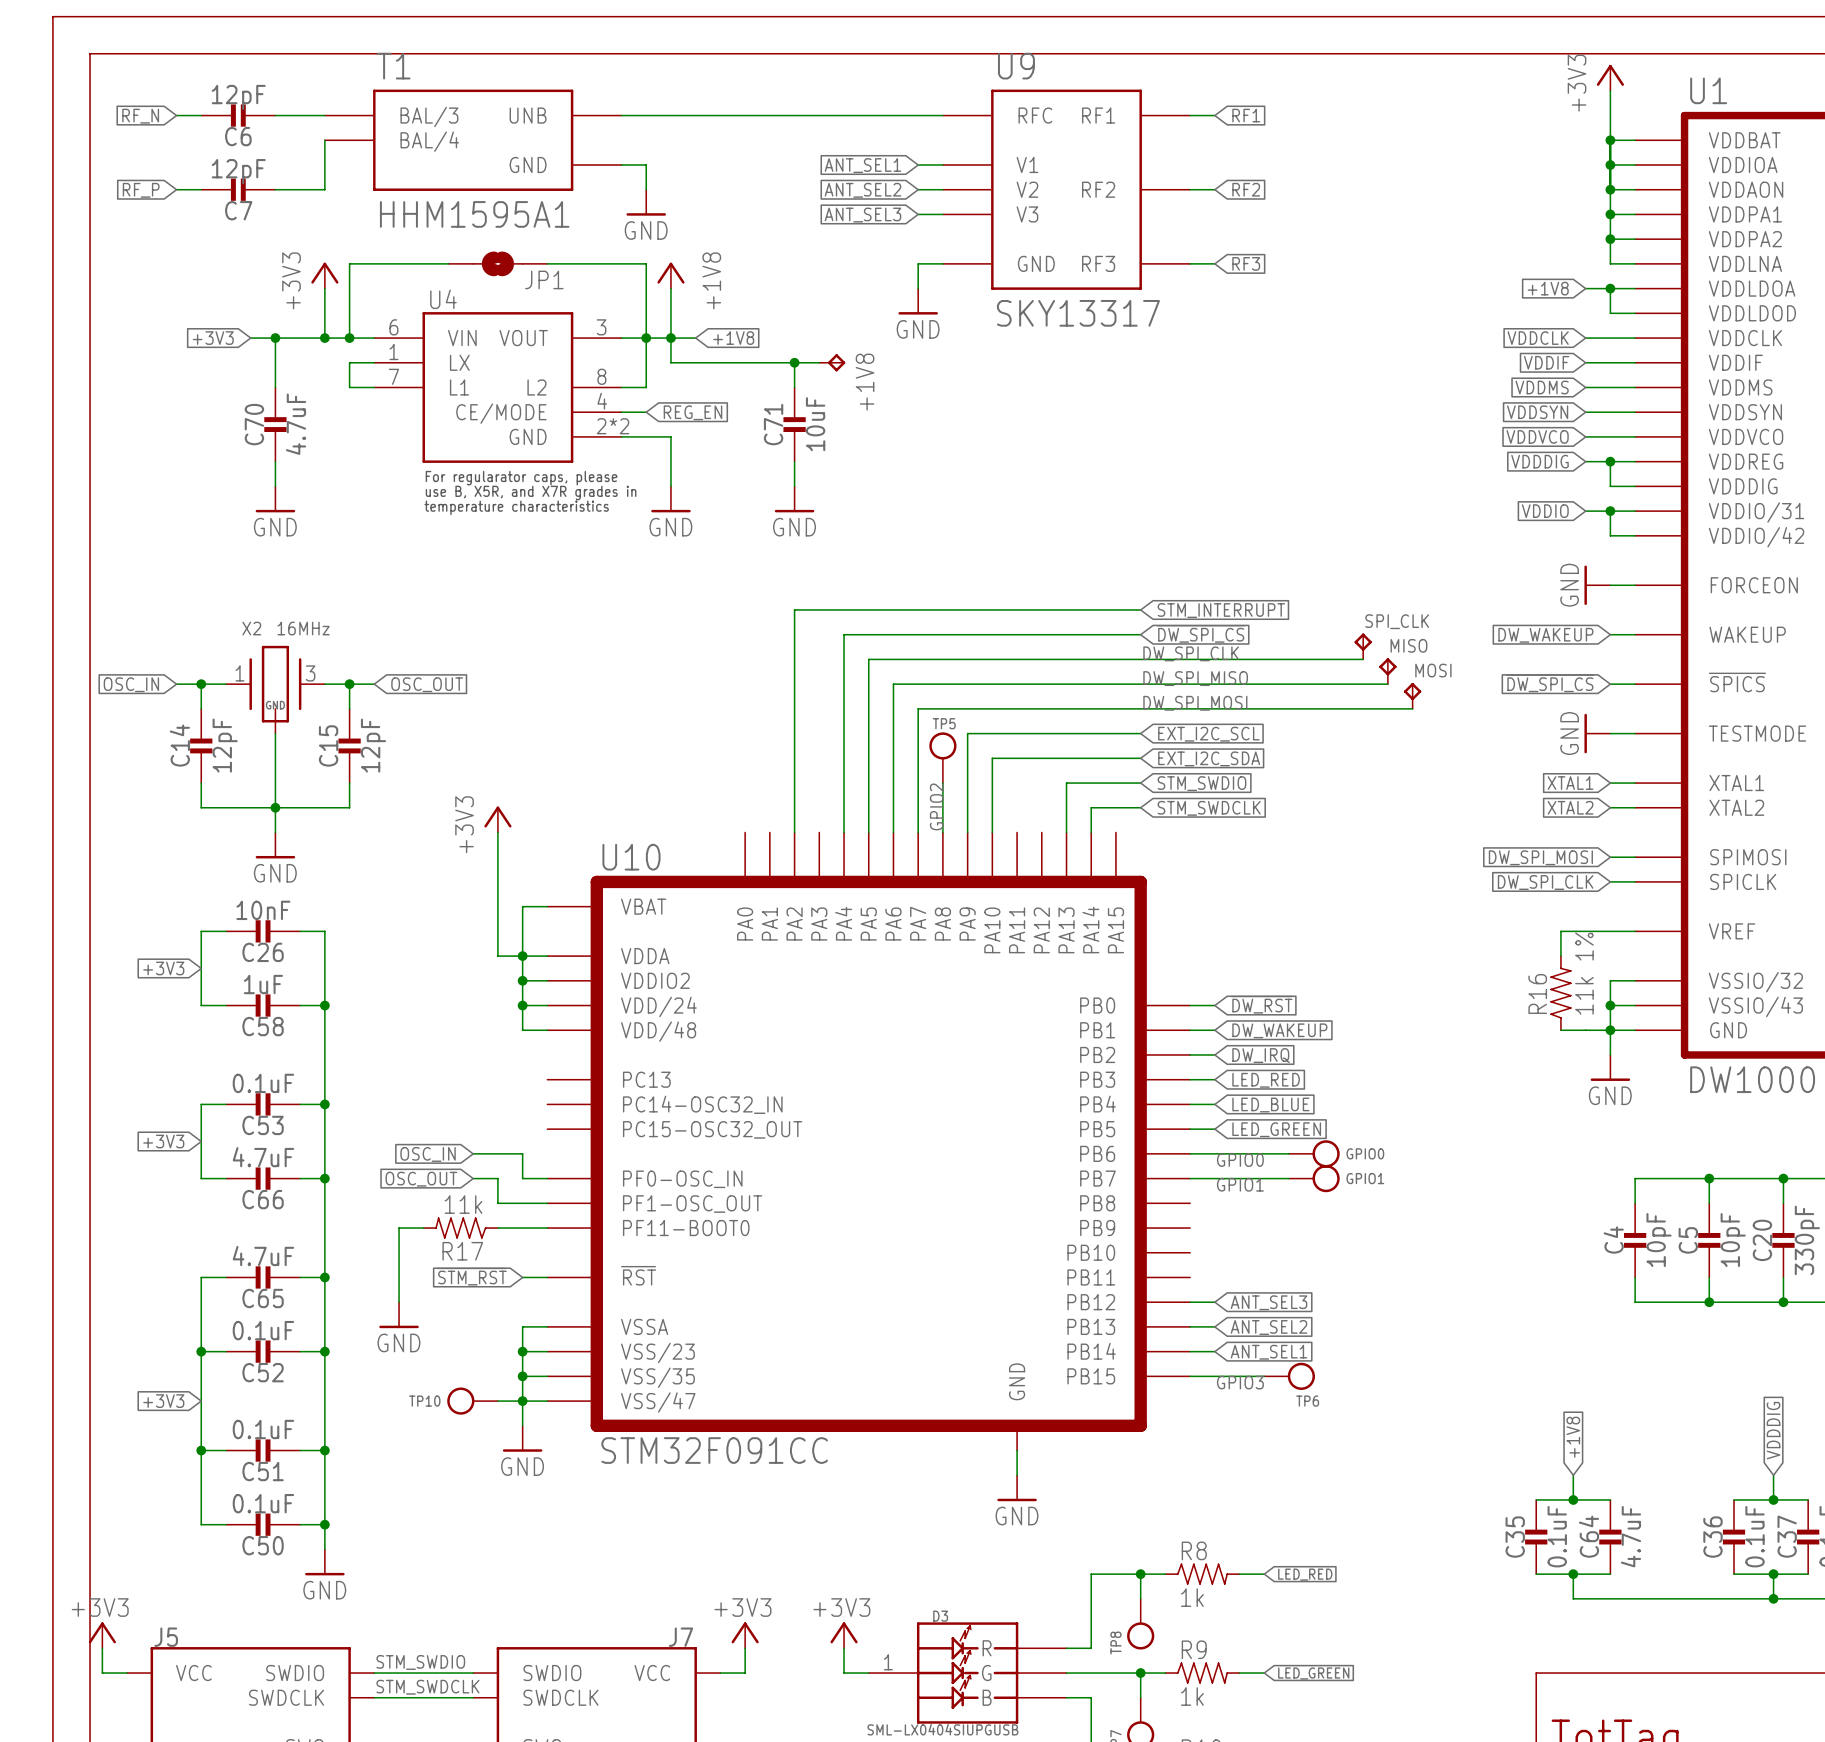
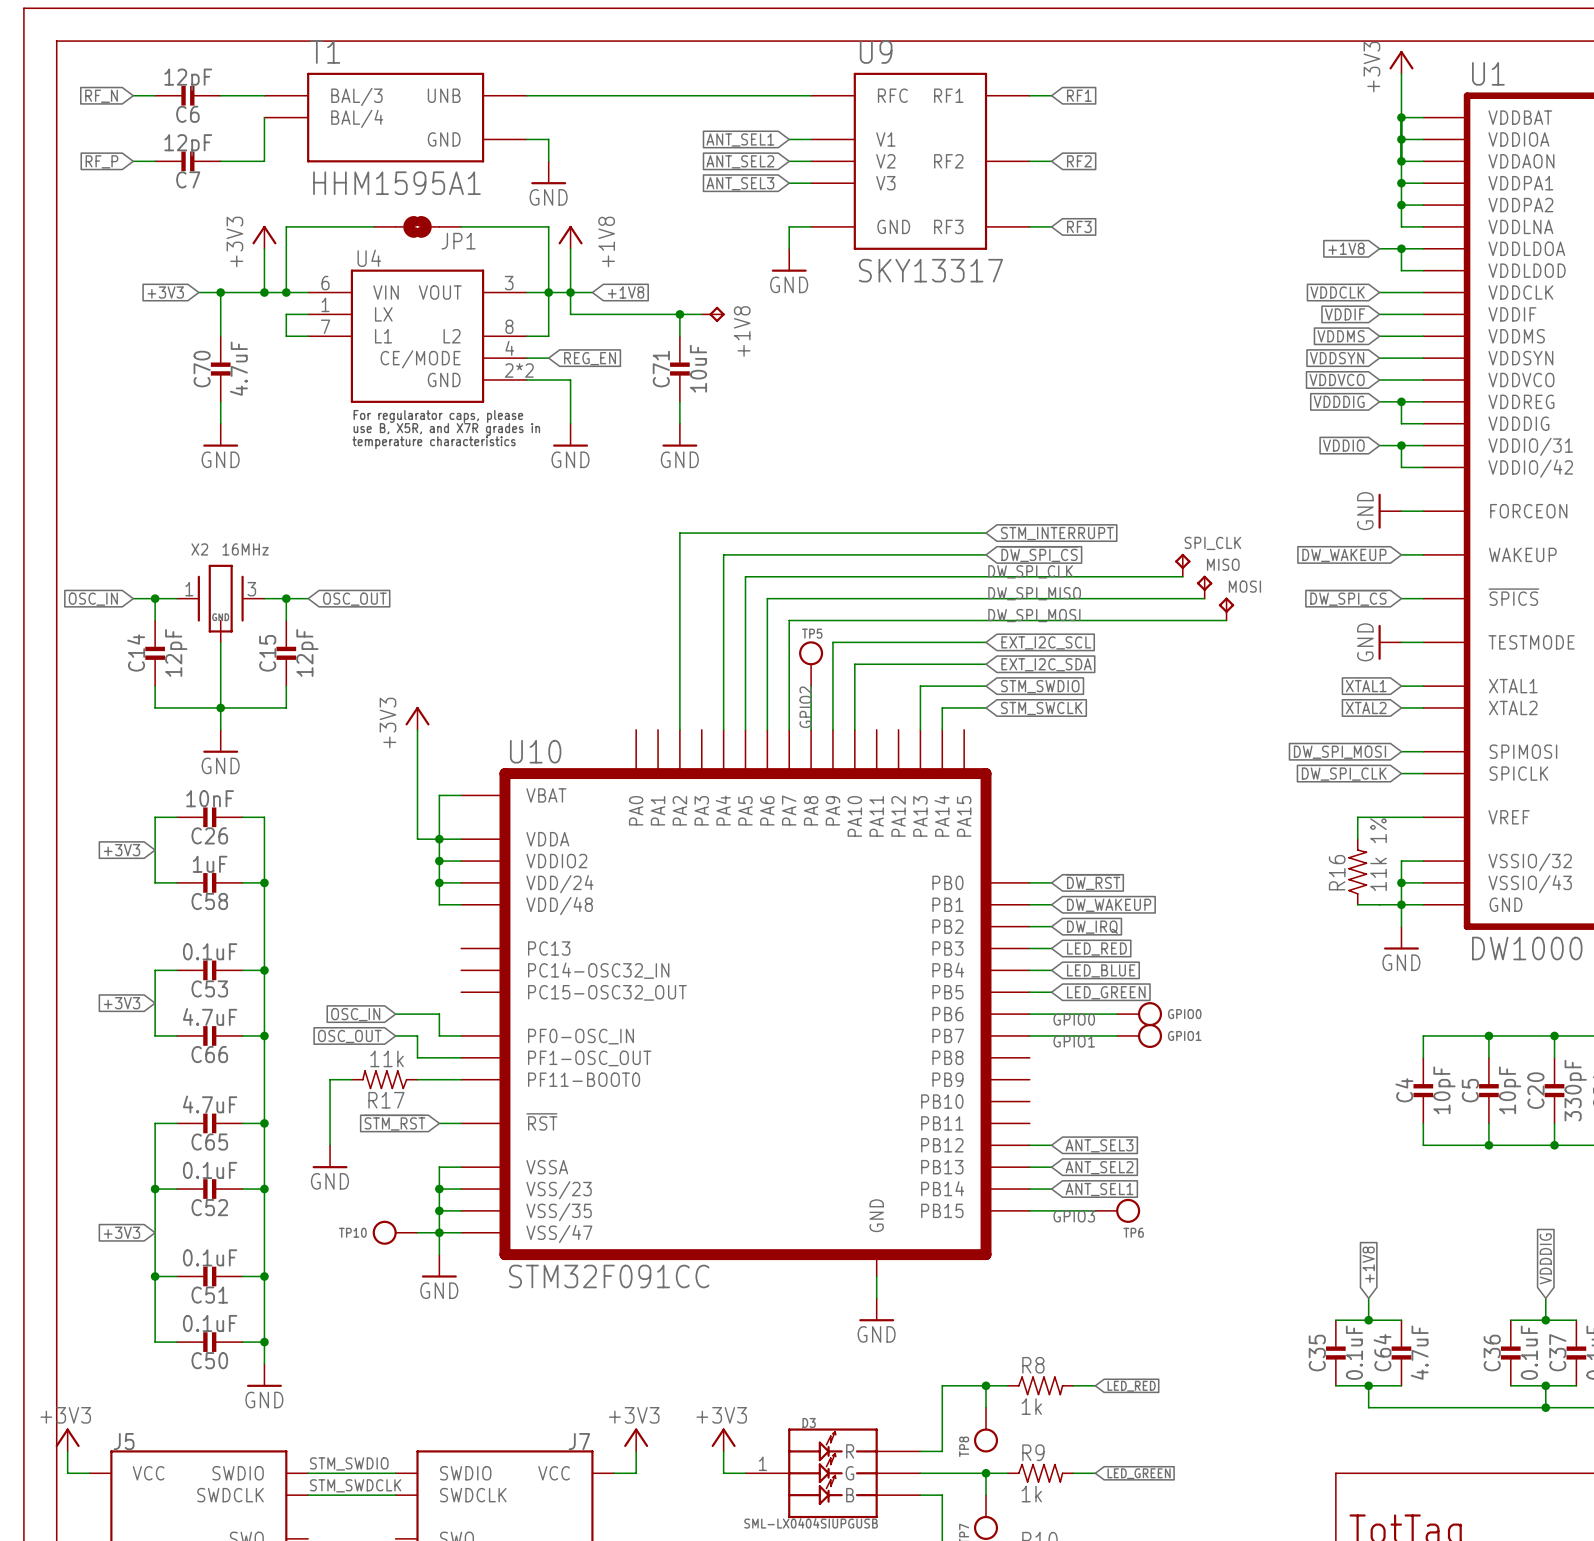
global label: STM_SWDCLK (1209, 808) -> STM_SWCLK (1041, 708)

